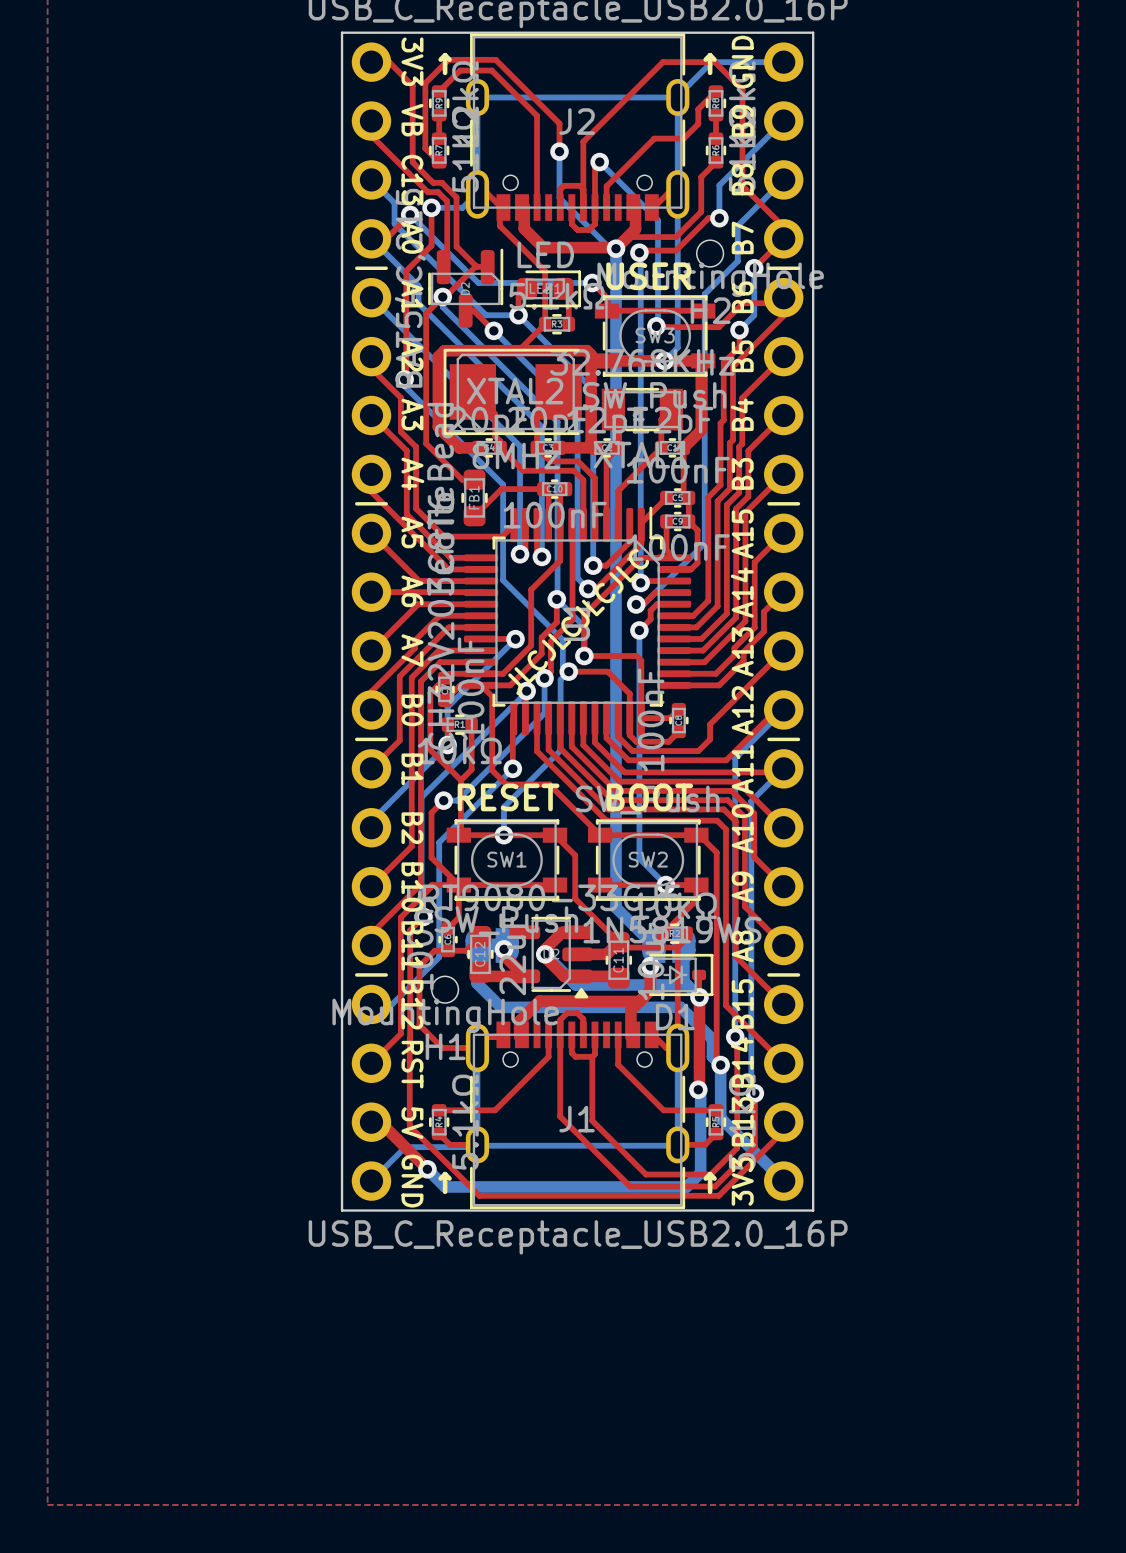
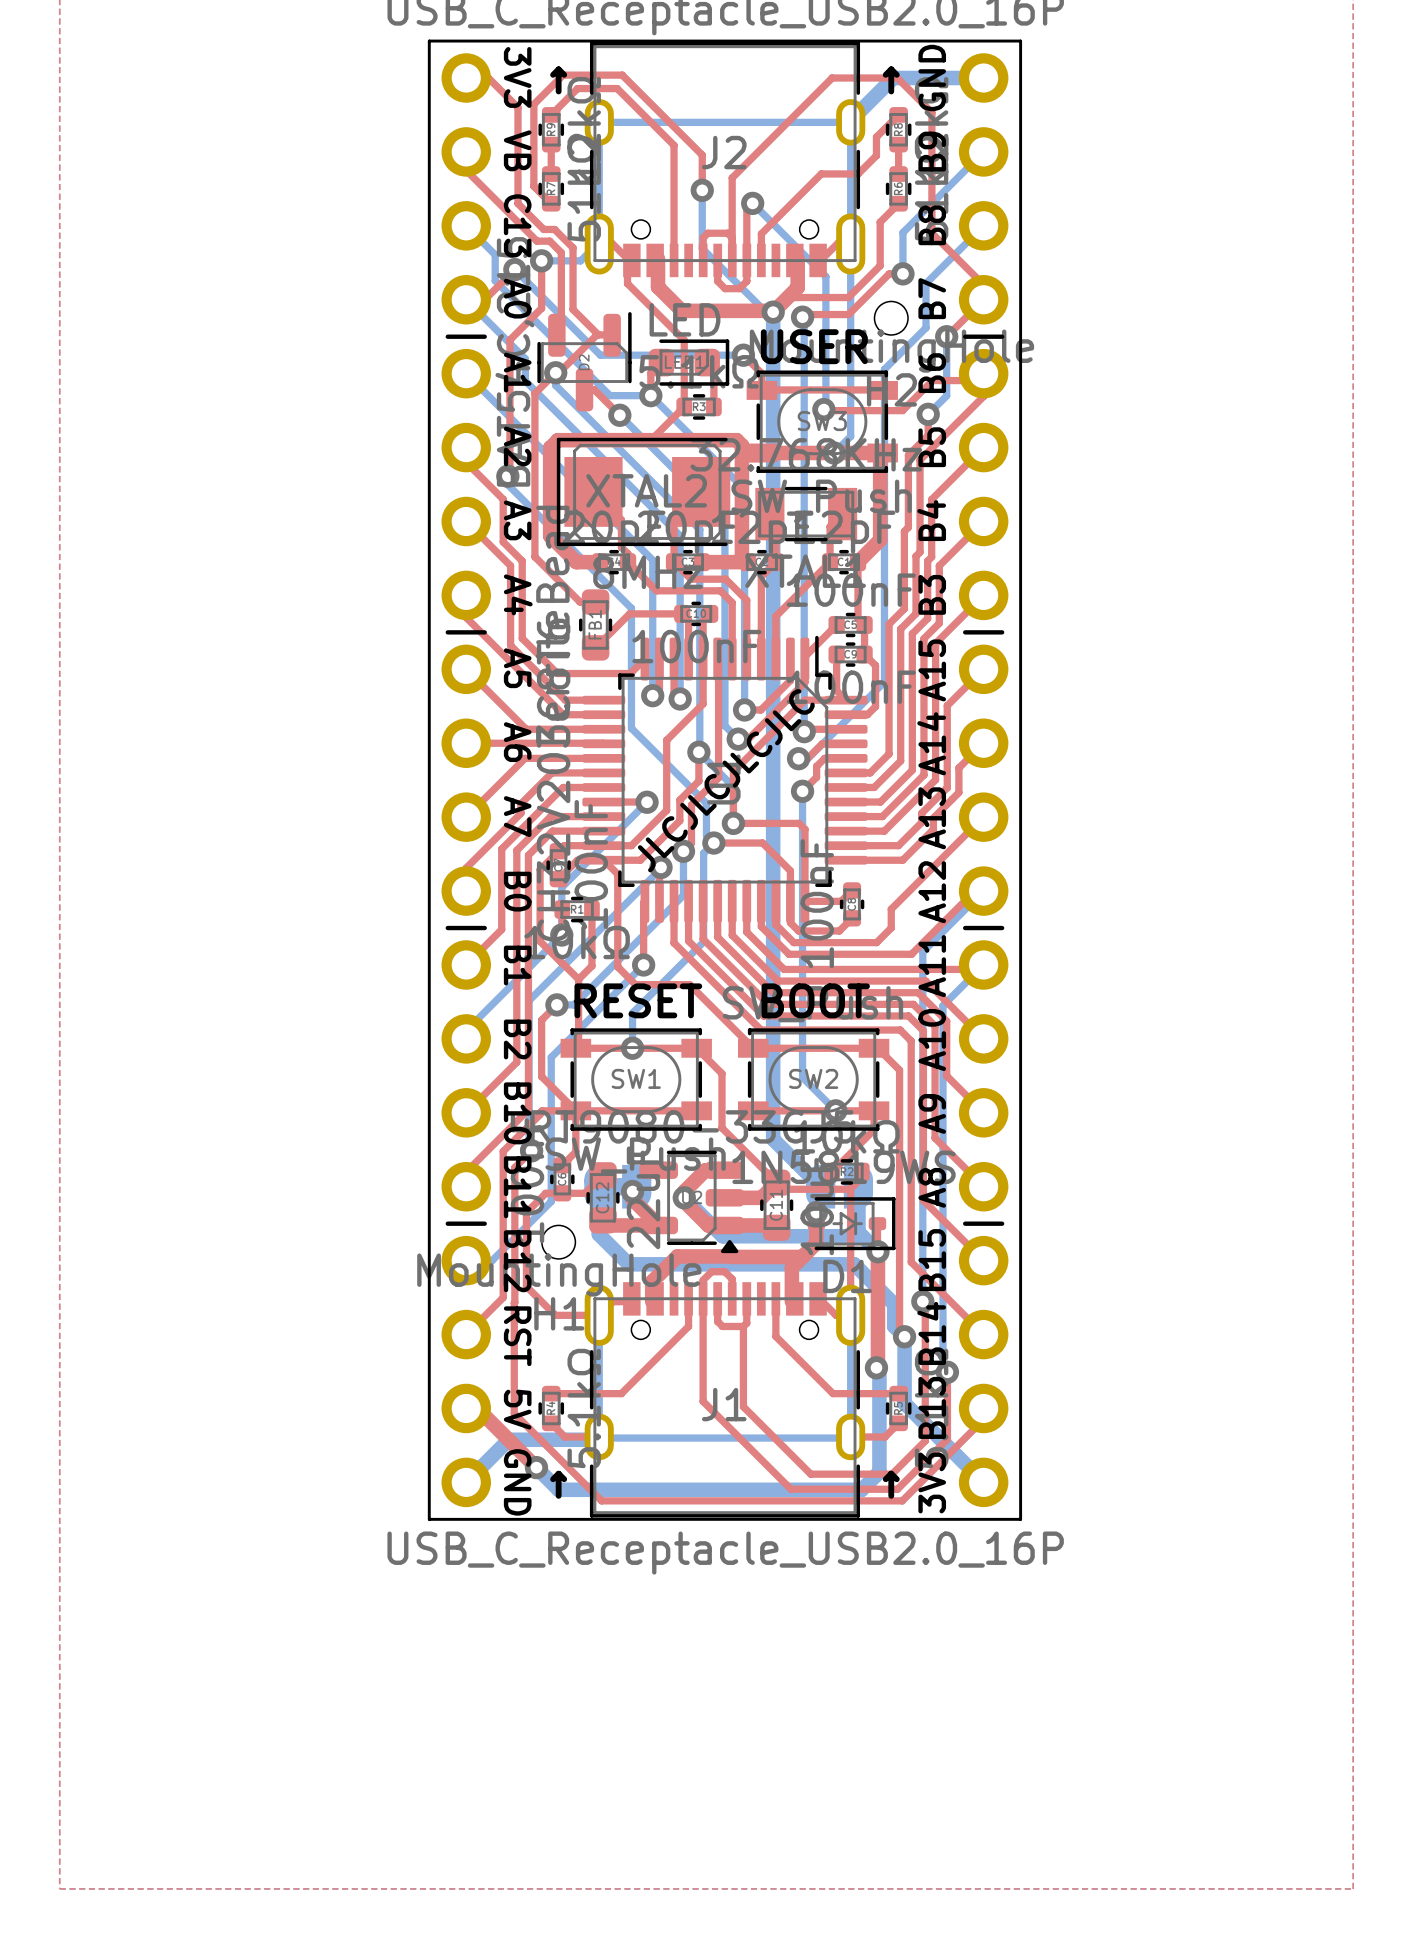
bottom track width: thin (783, 62) (711, 62) (677, 96) -> thick (983, 78) (893, 78) (850, 120)
bottom track width: thin (475, 1147) (405, 1147) (371, 1181) -> thick (596, 1439) (508, 1439) (466, 1482)

